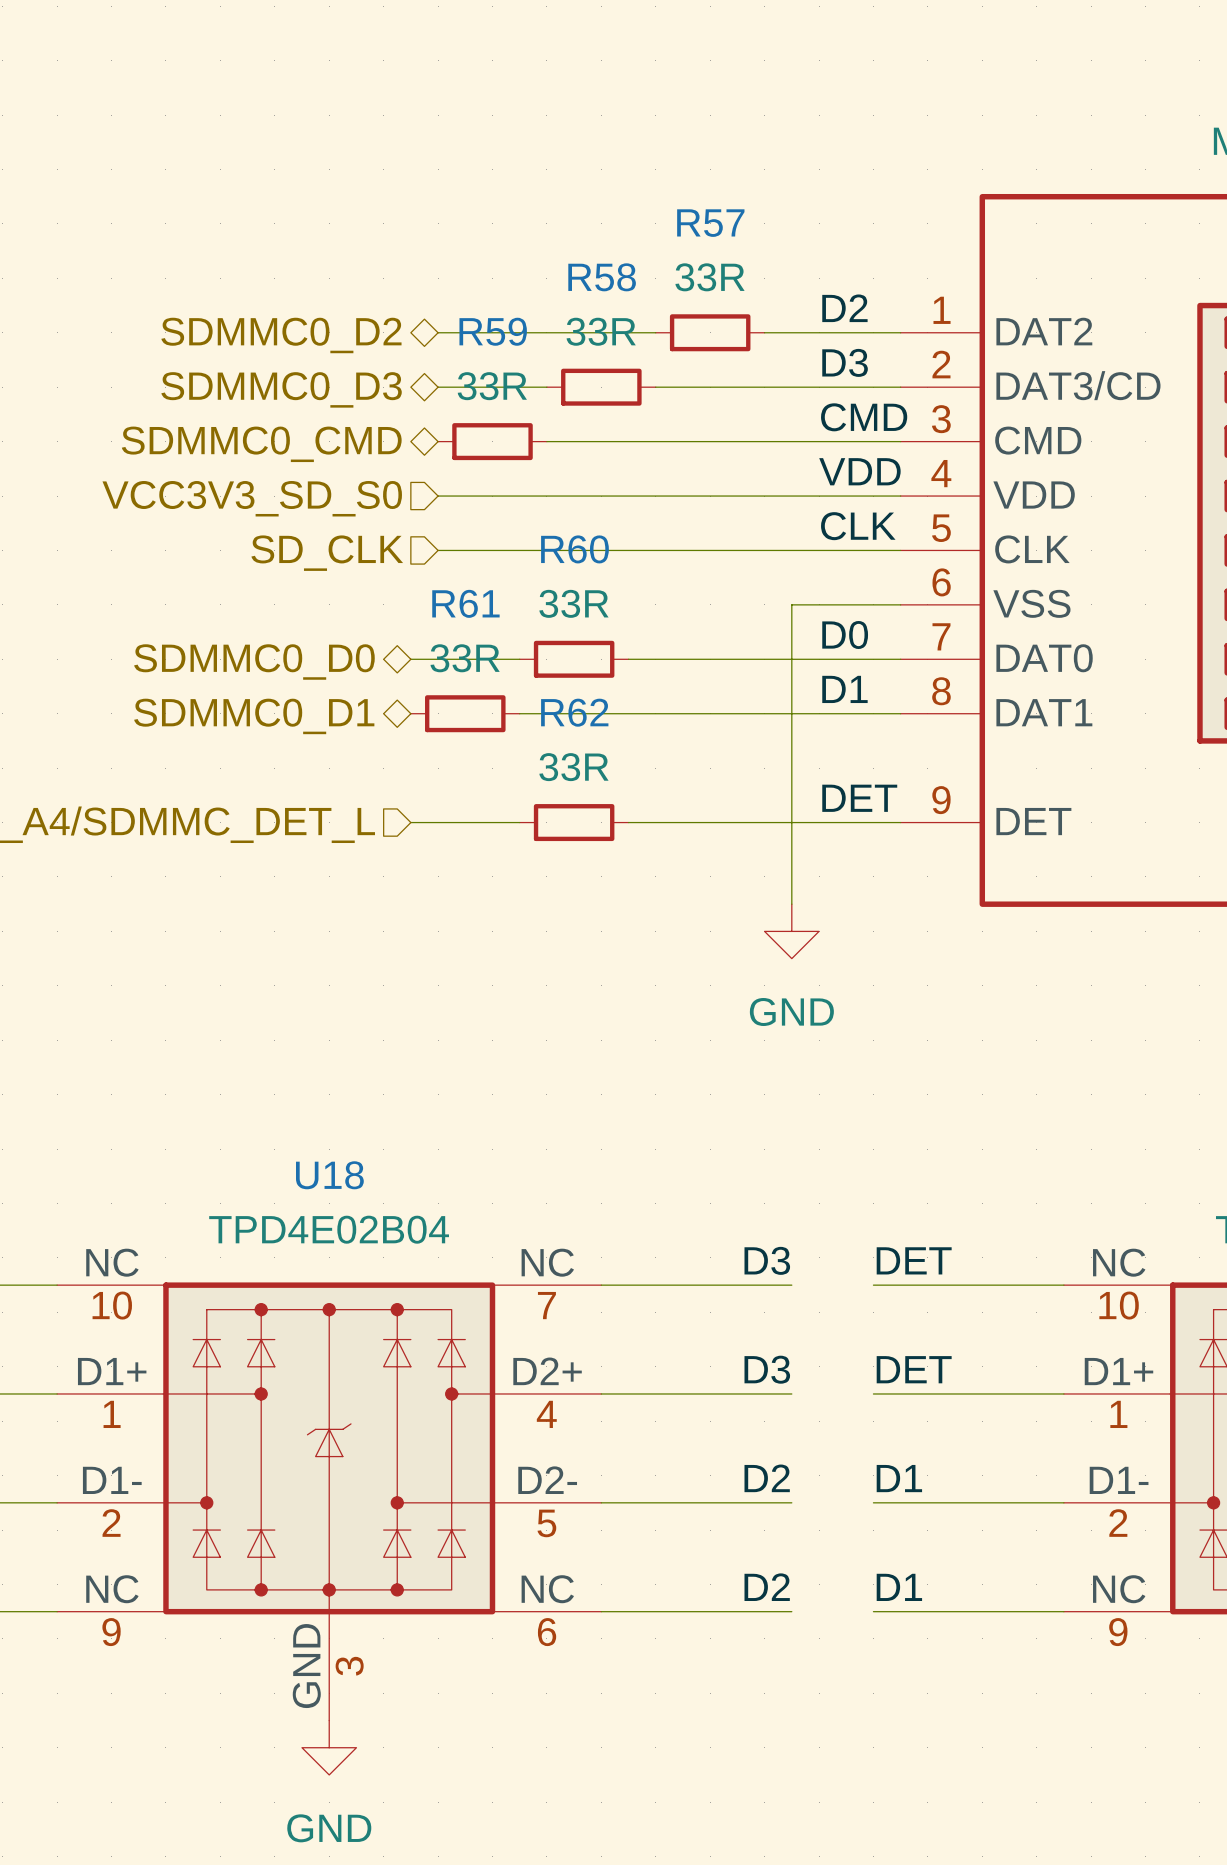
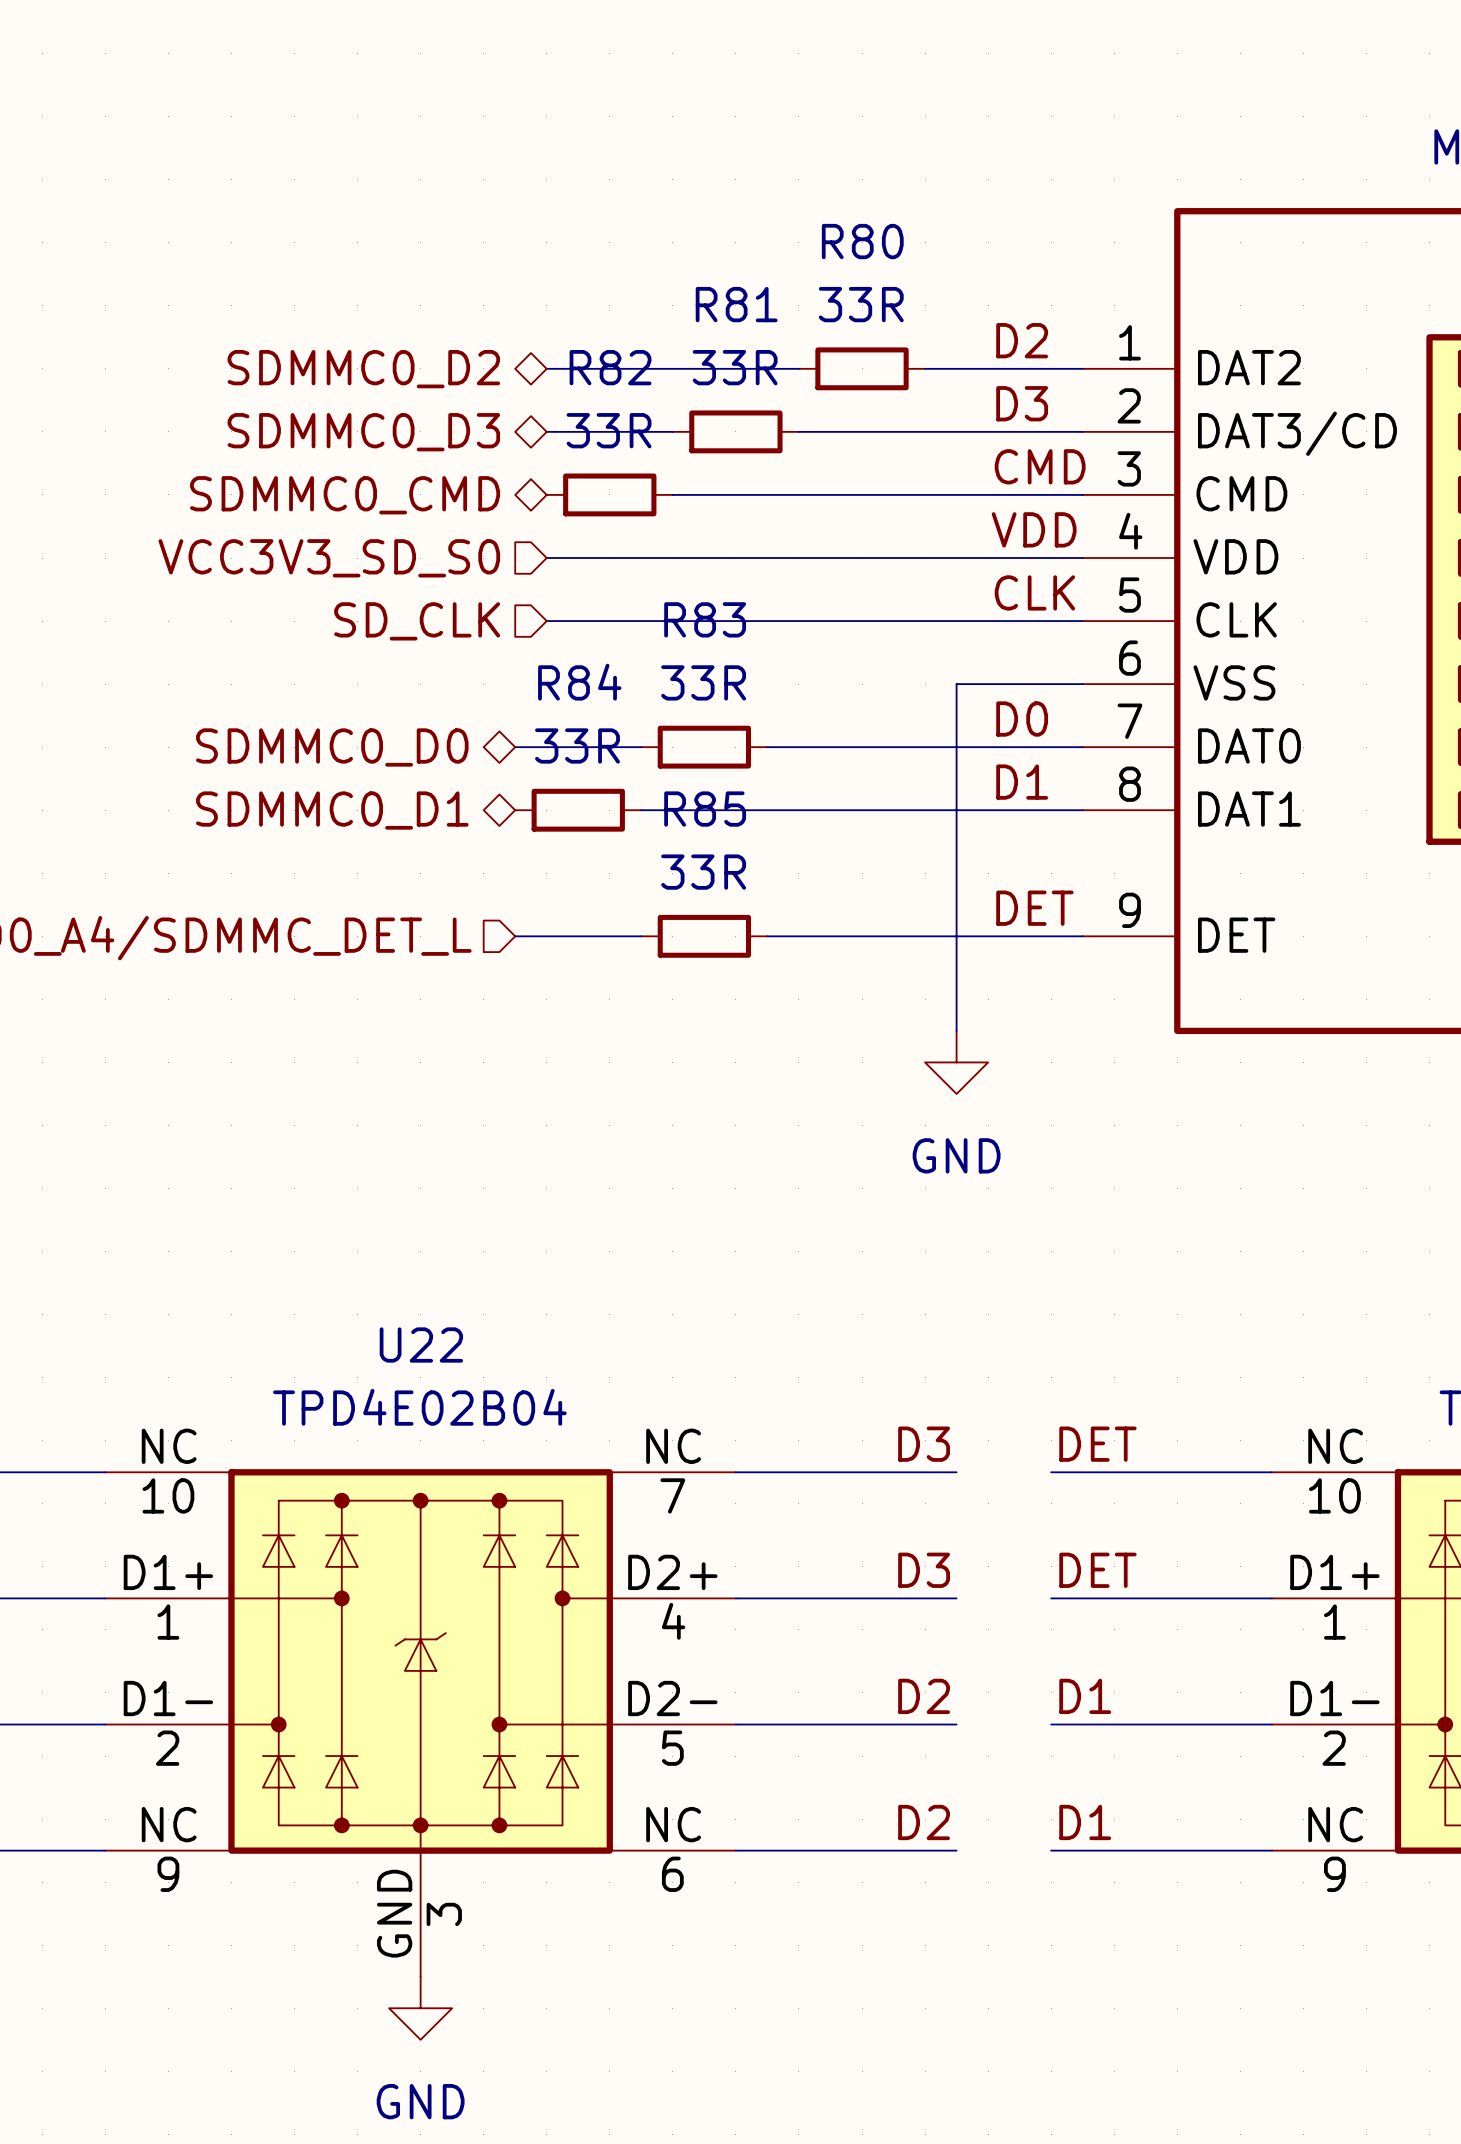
R57 name: R57 (710, 223) -> R80 (862, 241)
R58 name: R58 (602, 277) -> R81 (736, 304)
R59 name: R59 (493, 331) -> R82 (610, 367)
R60 name: R60 (574, 549) -> R83 (705, 619)
R61 name: R61 (465, 603) -> R84 (579, 682)
R62 name: R62 (574, 712) -> R85 (705, 809)
U18 name: U18 (329, 1175) -> U22 (421, 1345)

